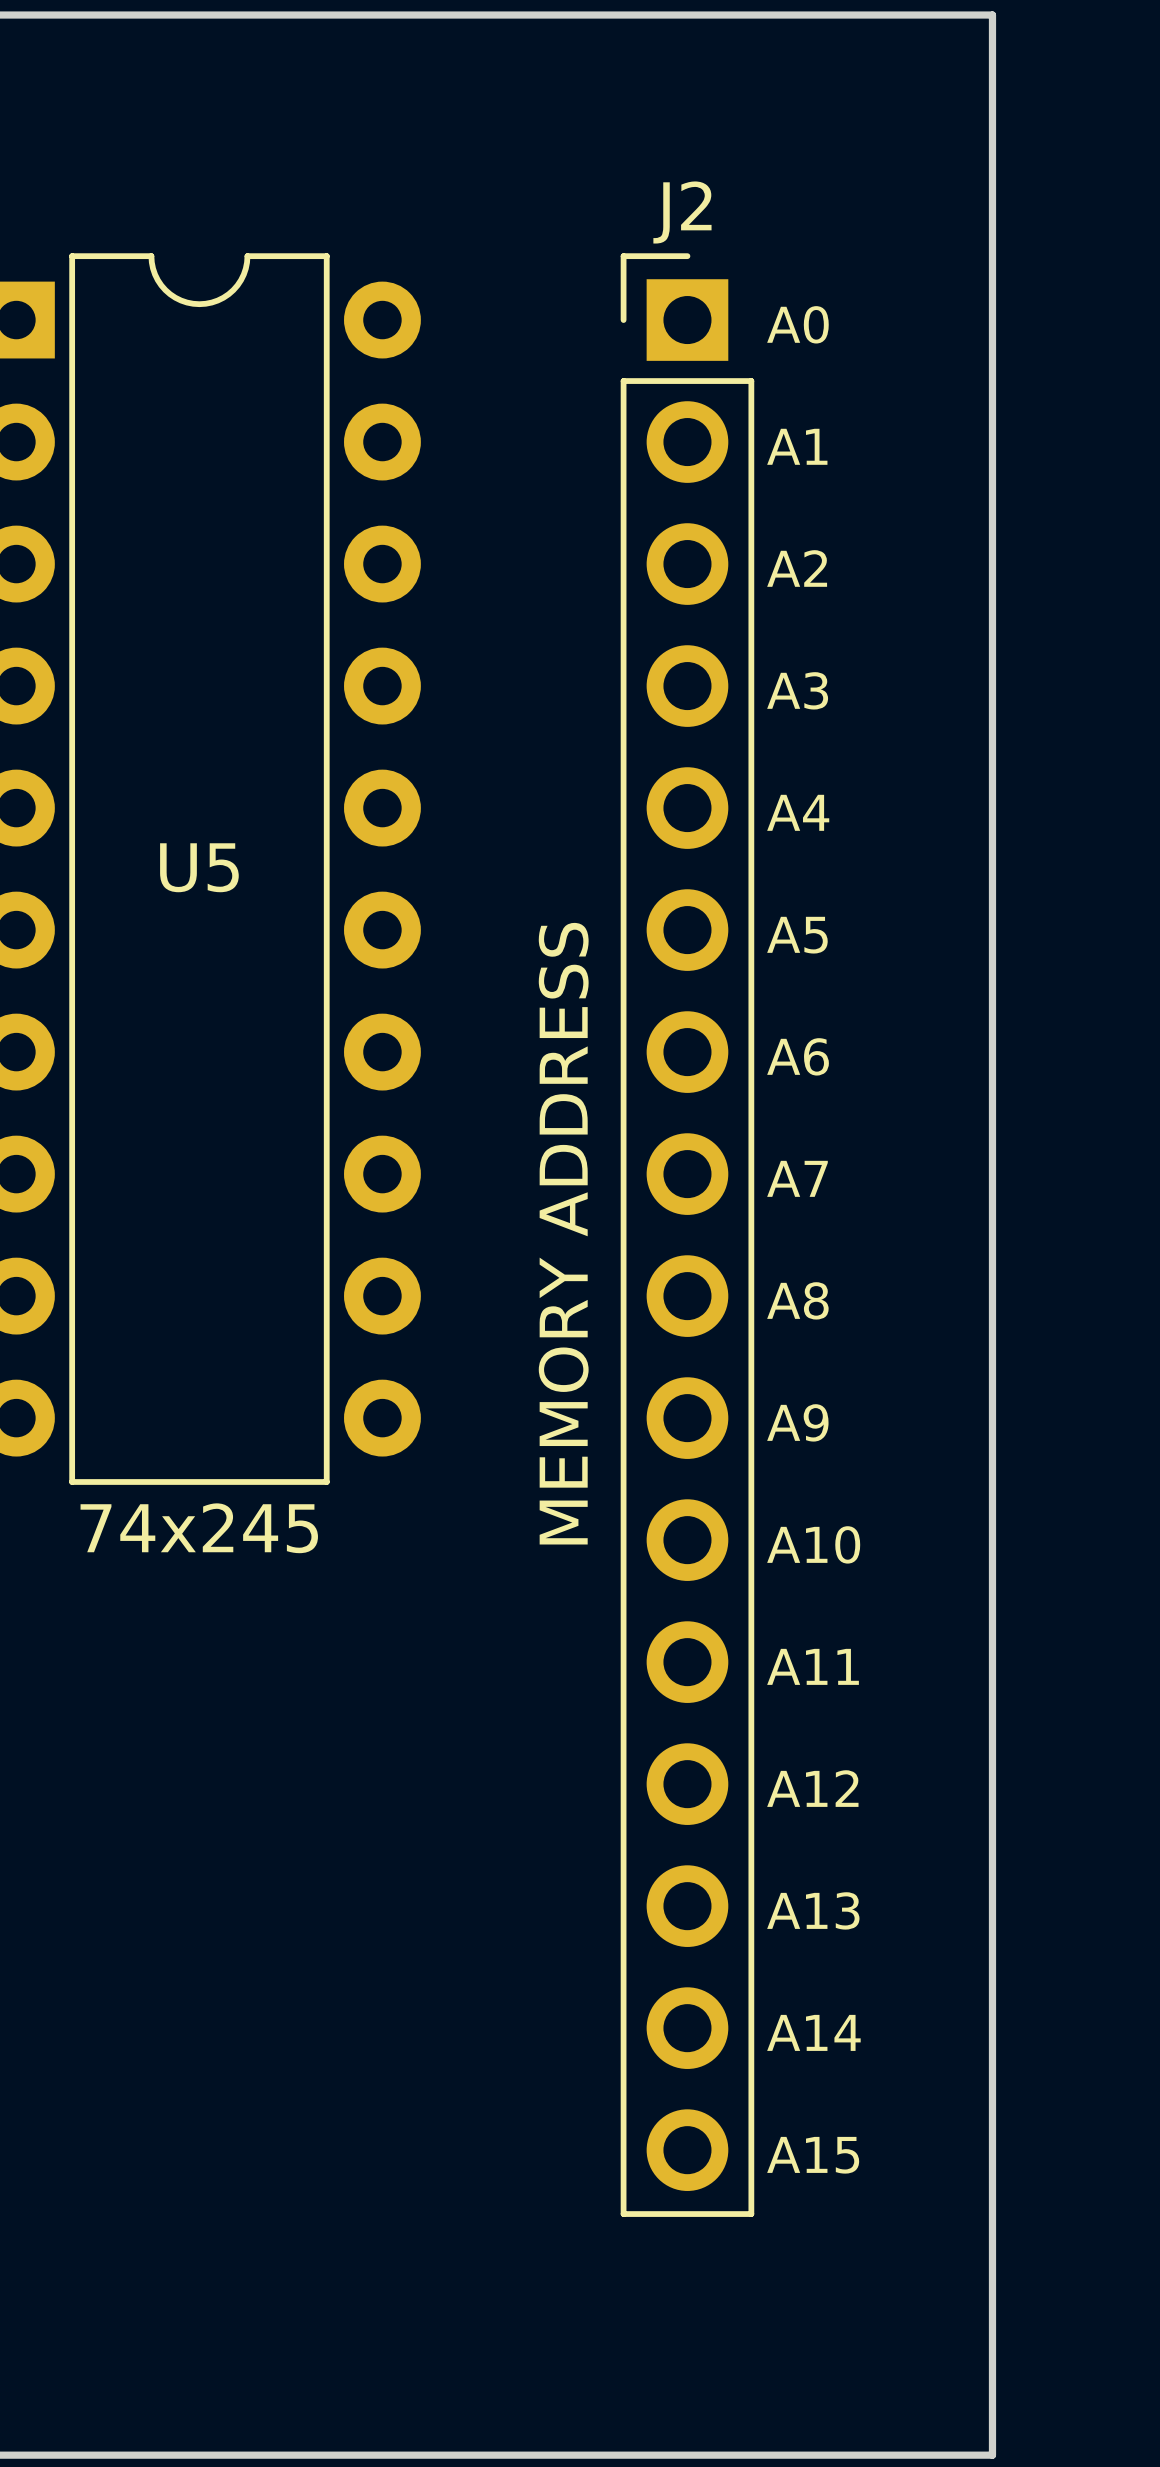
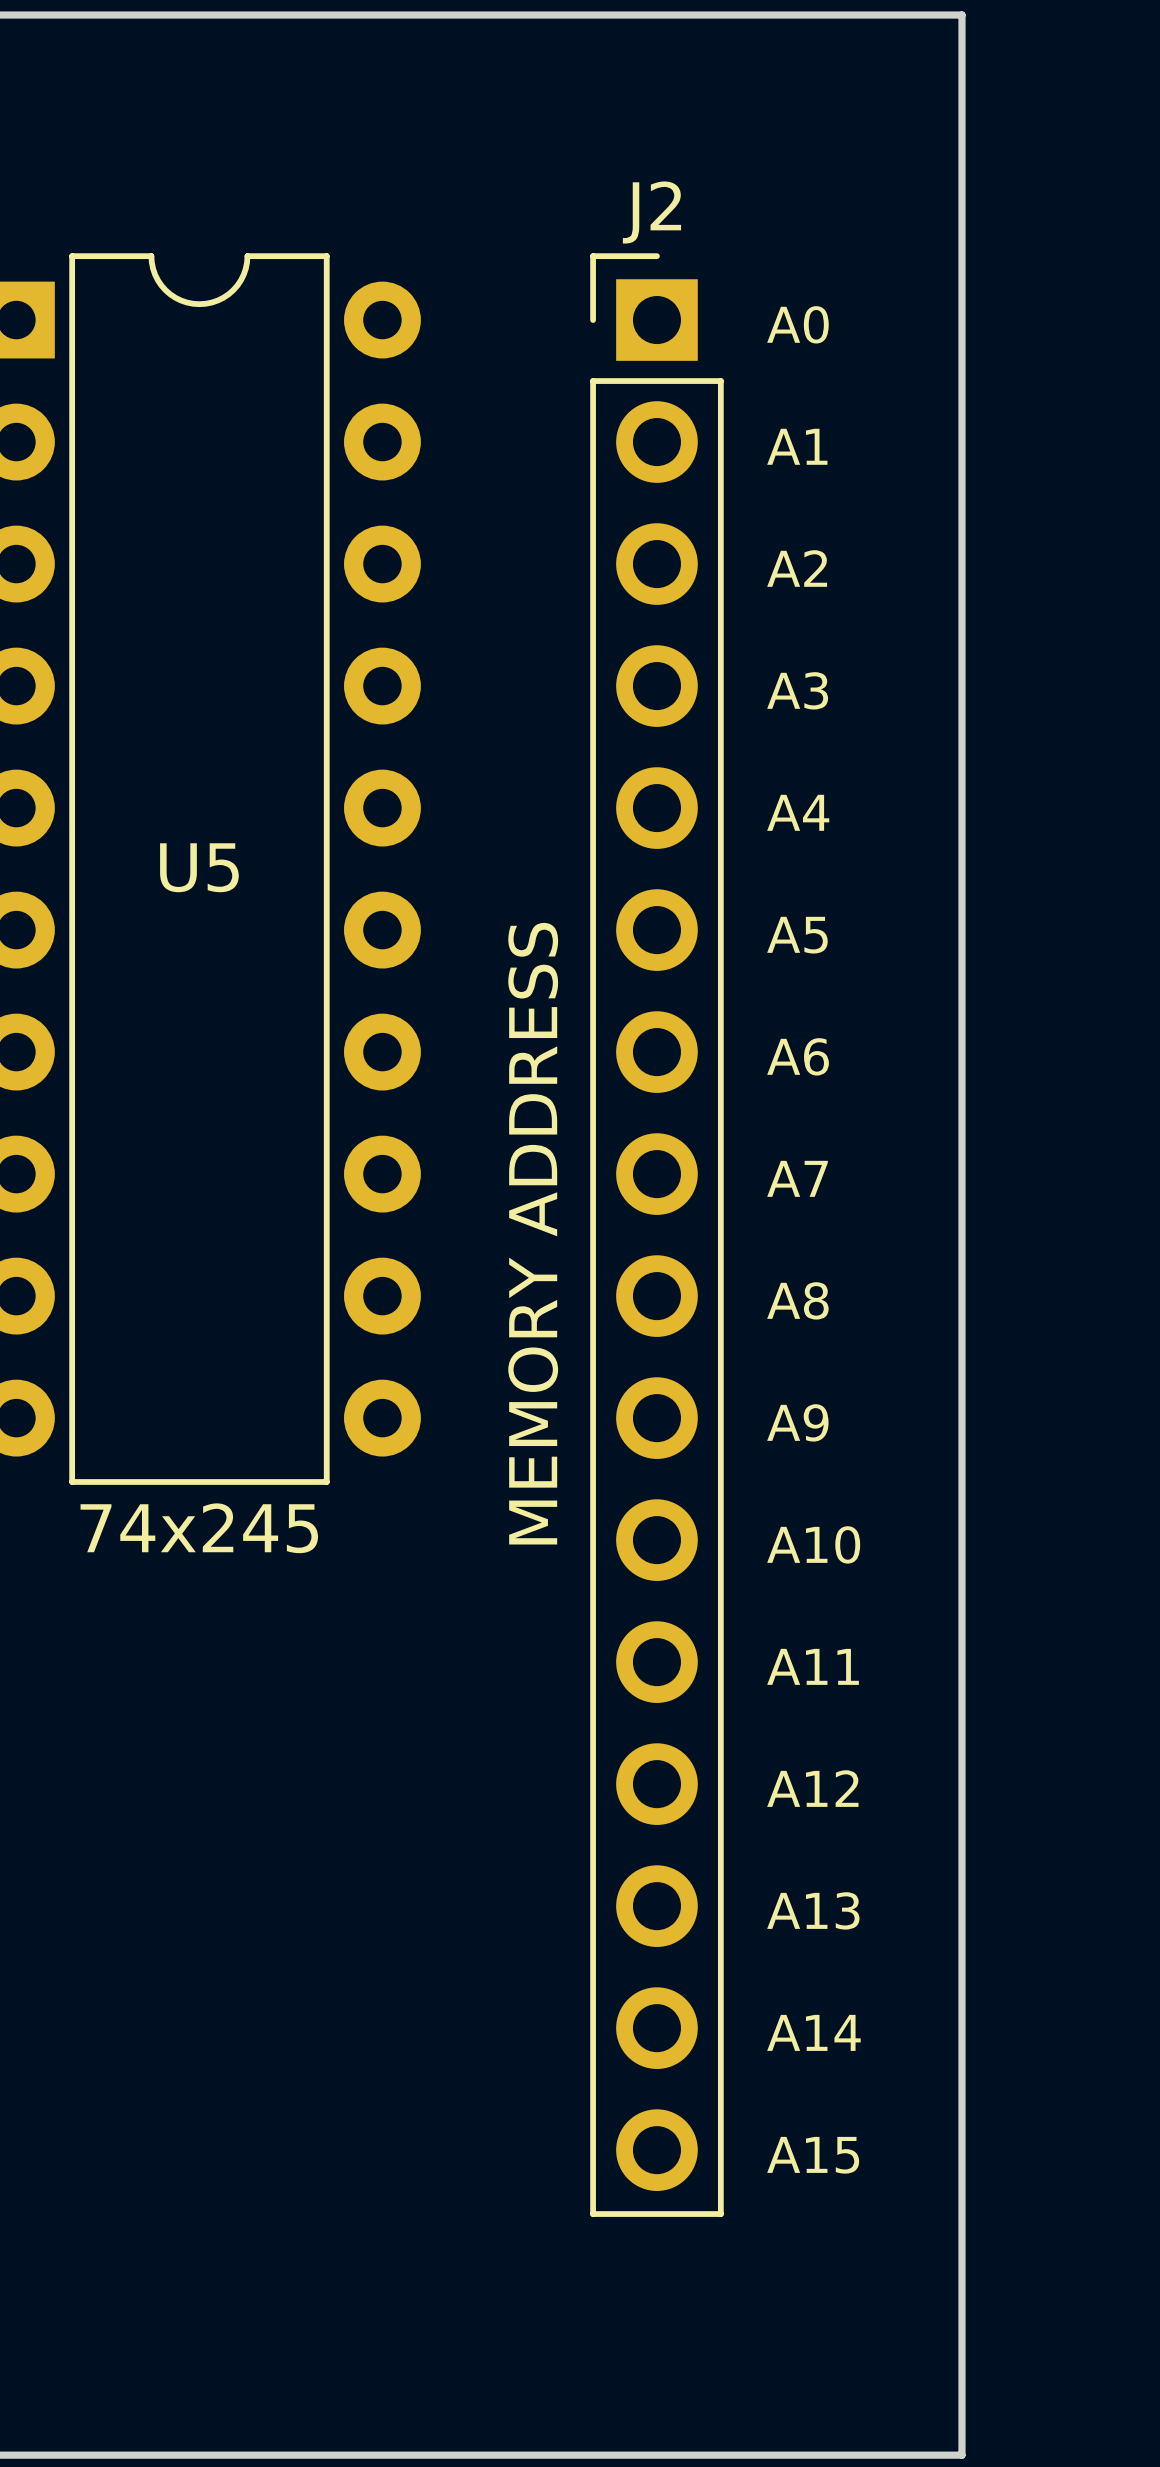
board edge: (961, 15) (992, 15) (992, 2455) (961, 2455) -> (961, 15) (961, 2455)
J2 position: (687, 1235) -> (656, 1235)

